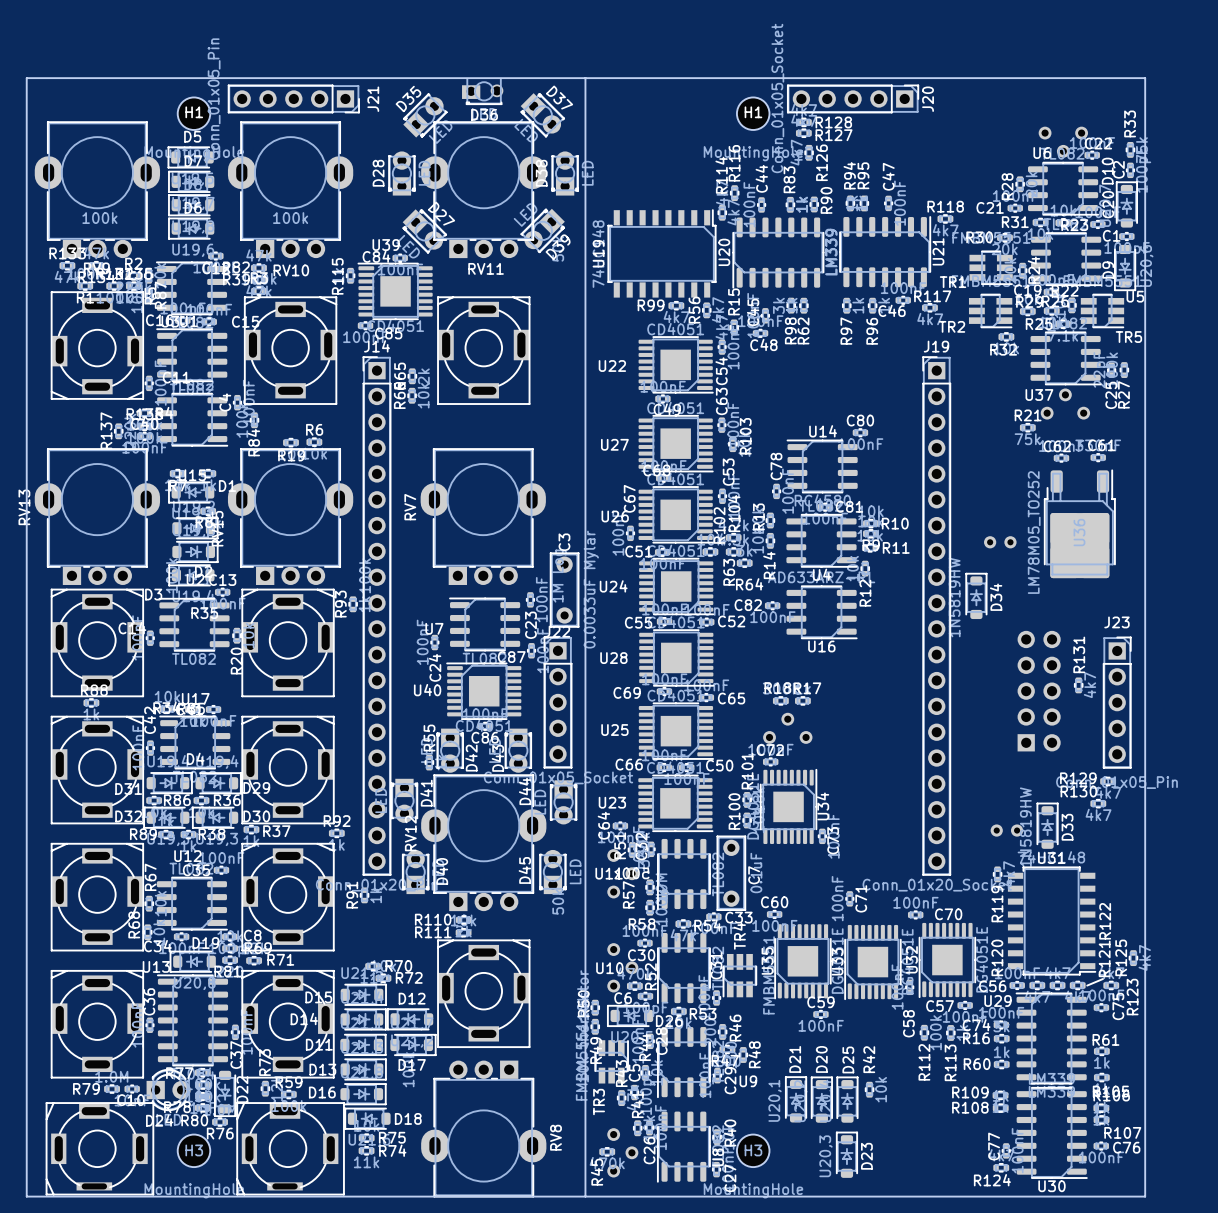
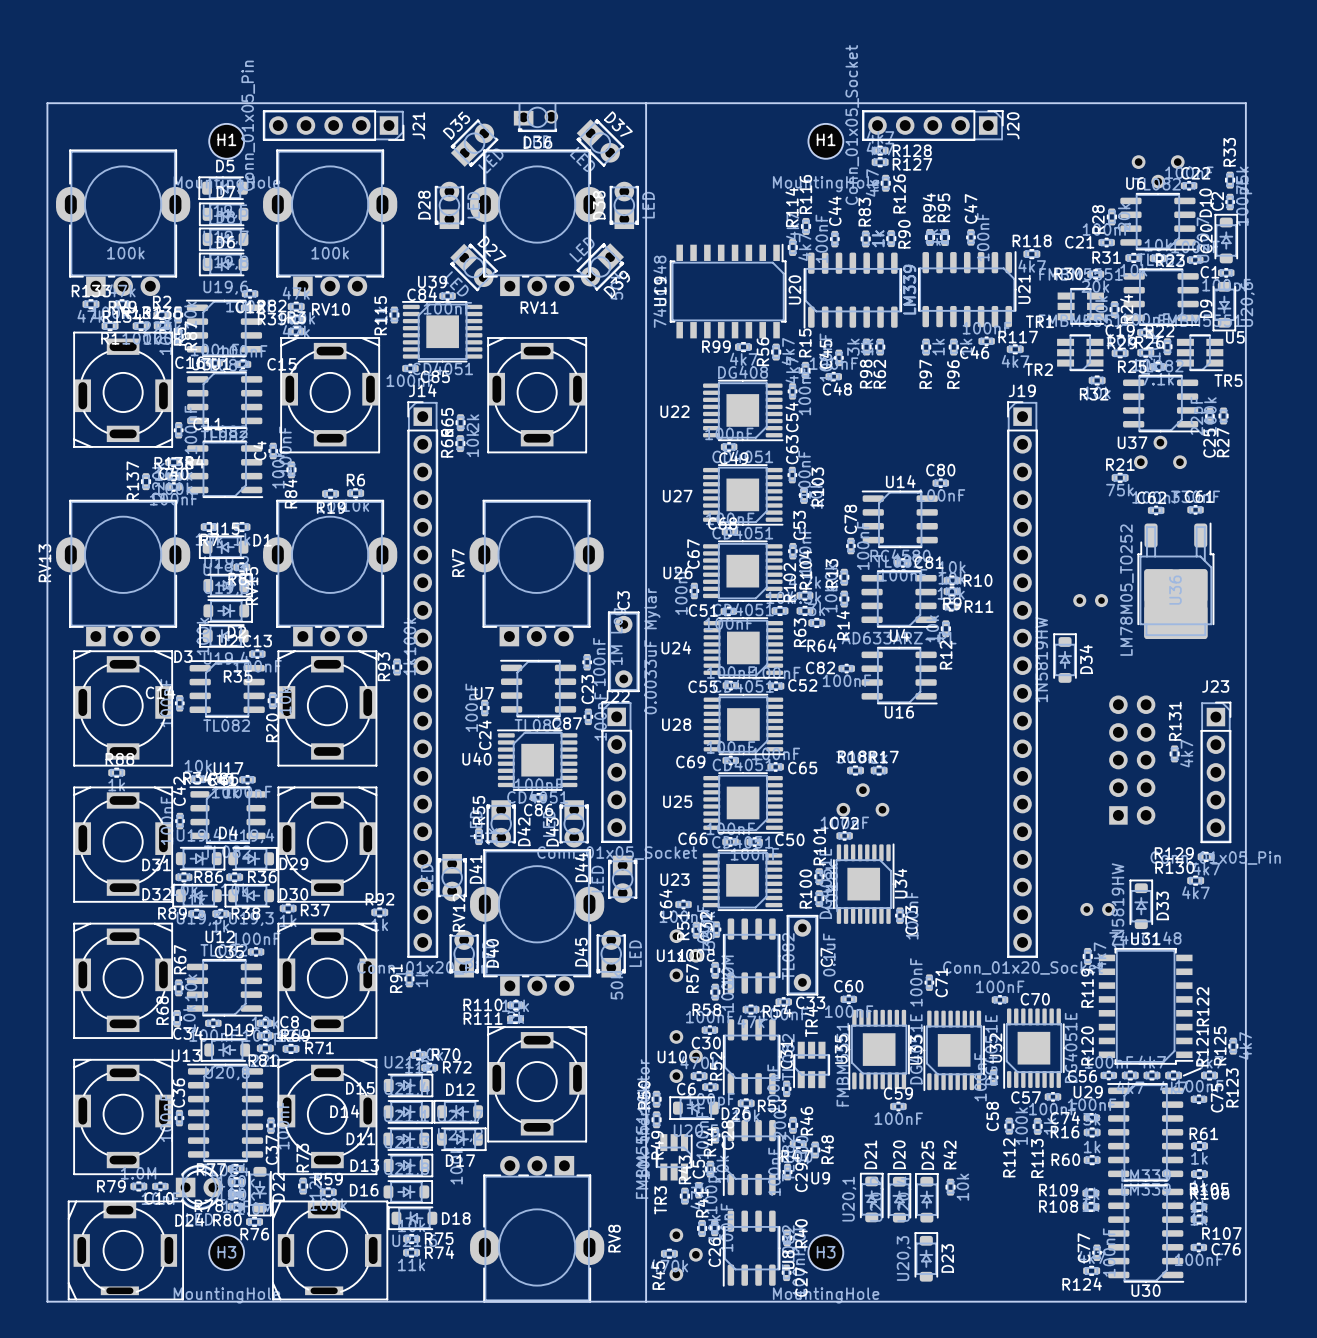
U22 value: CD4051 (675, 329) -> DG408 (743, 372)

